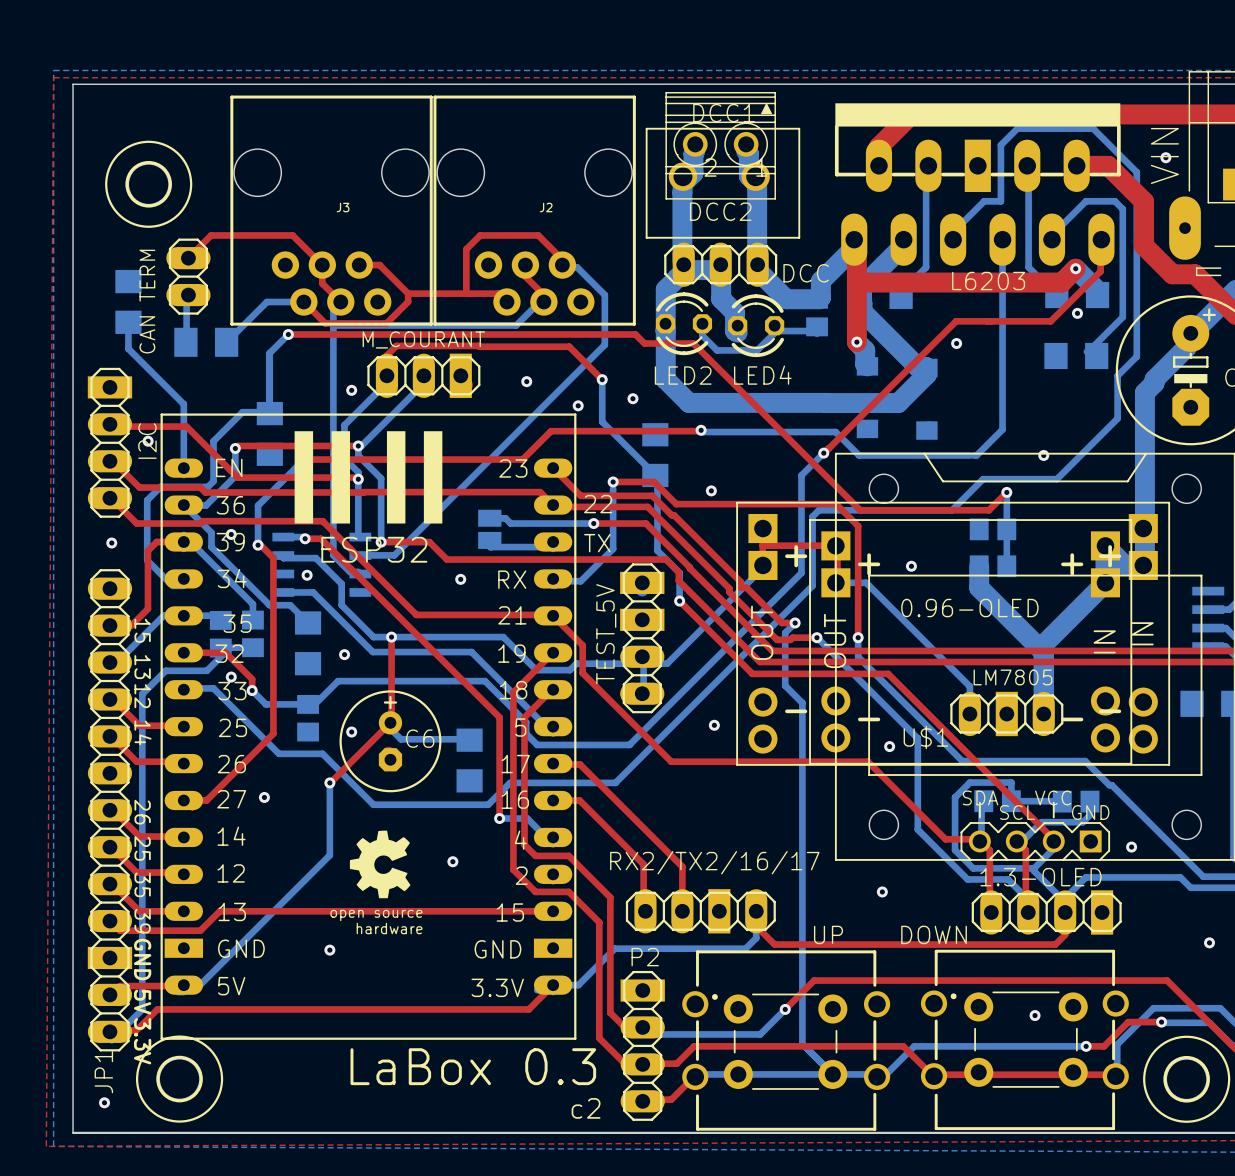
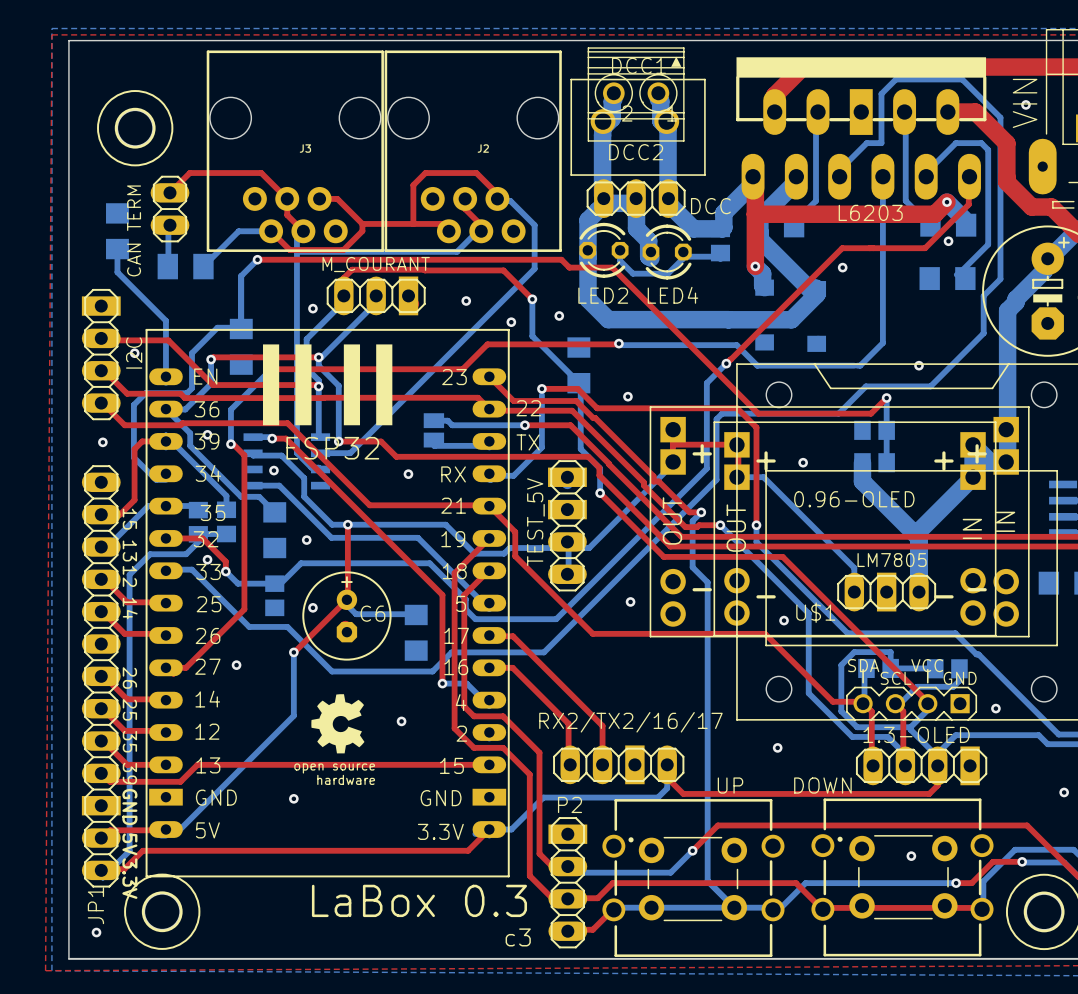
text: c2 (586, 1108) -> c3 (518, 937)

